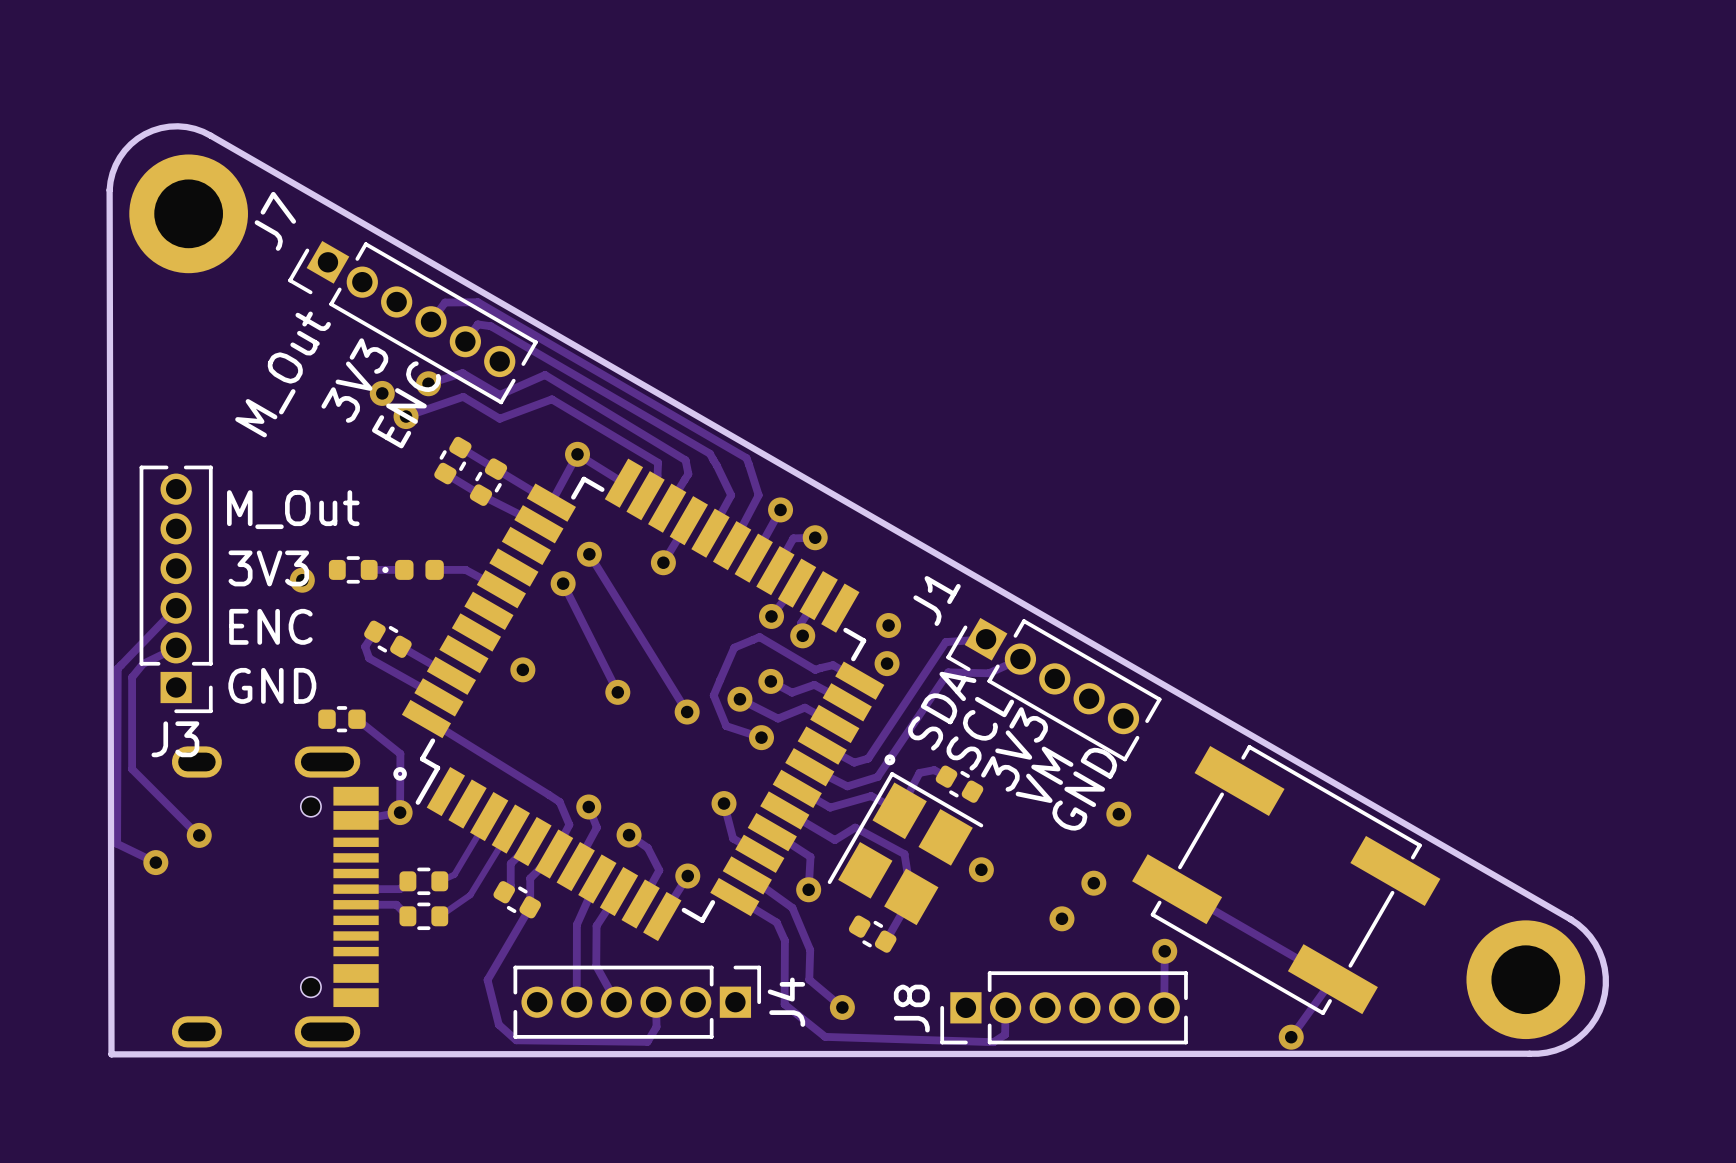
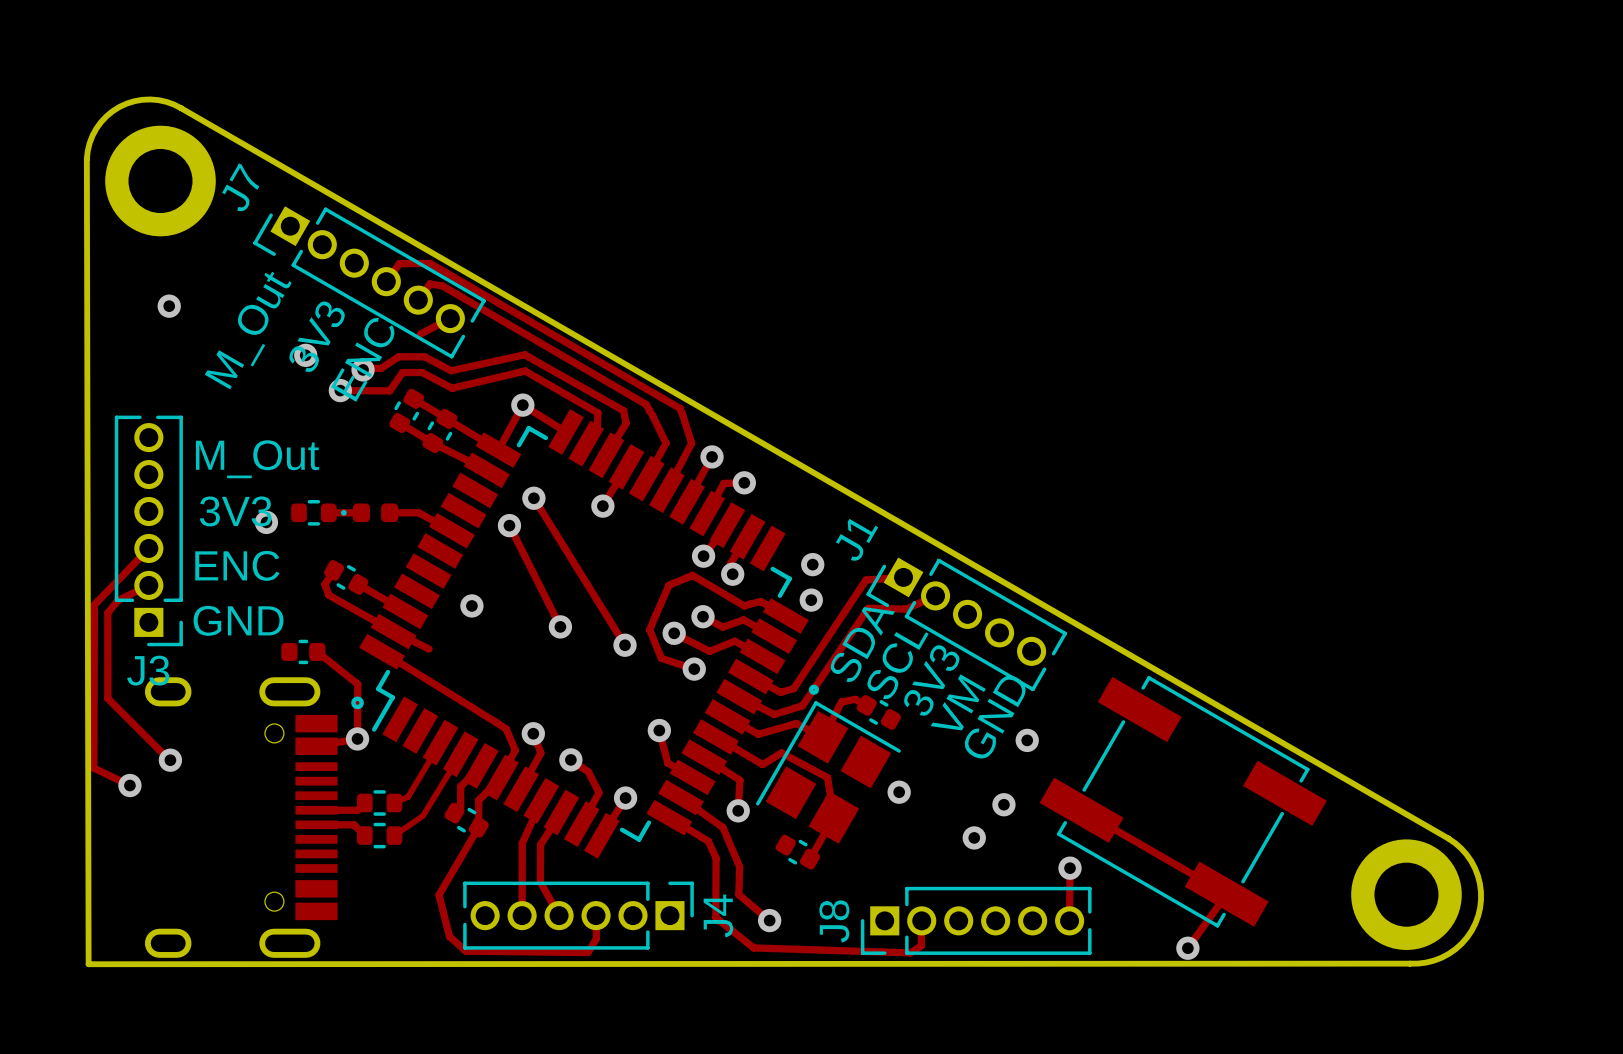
via: none -> (169, 306)
track: none -> (450, 318) (420, 334)
track: (428, 383) (462, 373) (499, 394) (545, 375) (685, 460) -> (364, 368) (381, 368) (398, 356) (424, 356) (451, 370) (524, 354) (623, 410)
via: (428, 383) -> none
via: (382, 393) -> none
via: none -> (305, 355)
track: (406, 416) (463, 396) (499, 418) (551, 399) (658, 462) -> (340, 390) (389, 390) (402, 372) (422, 372) (452, 388) (525, 371) (597, 412)
via: none -> (340, 390)
track: none -> (393, 631) (429, 649)

